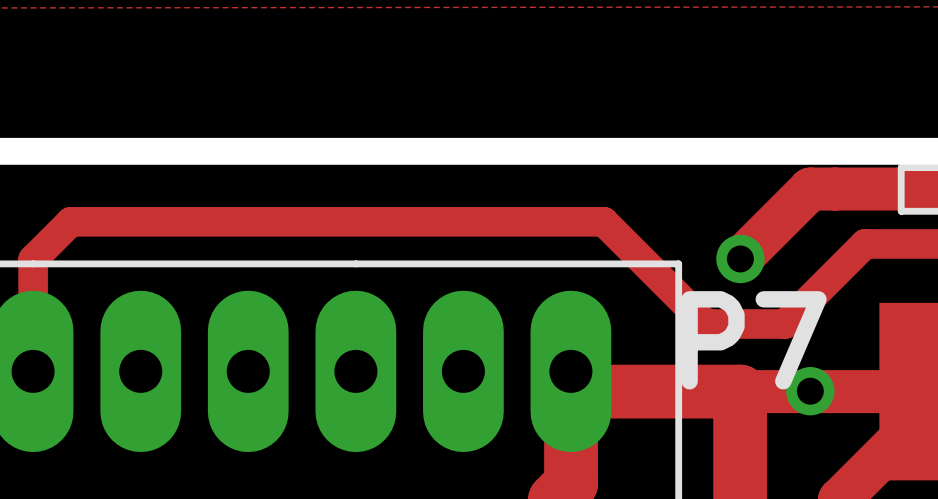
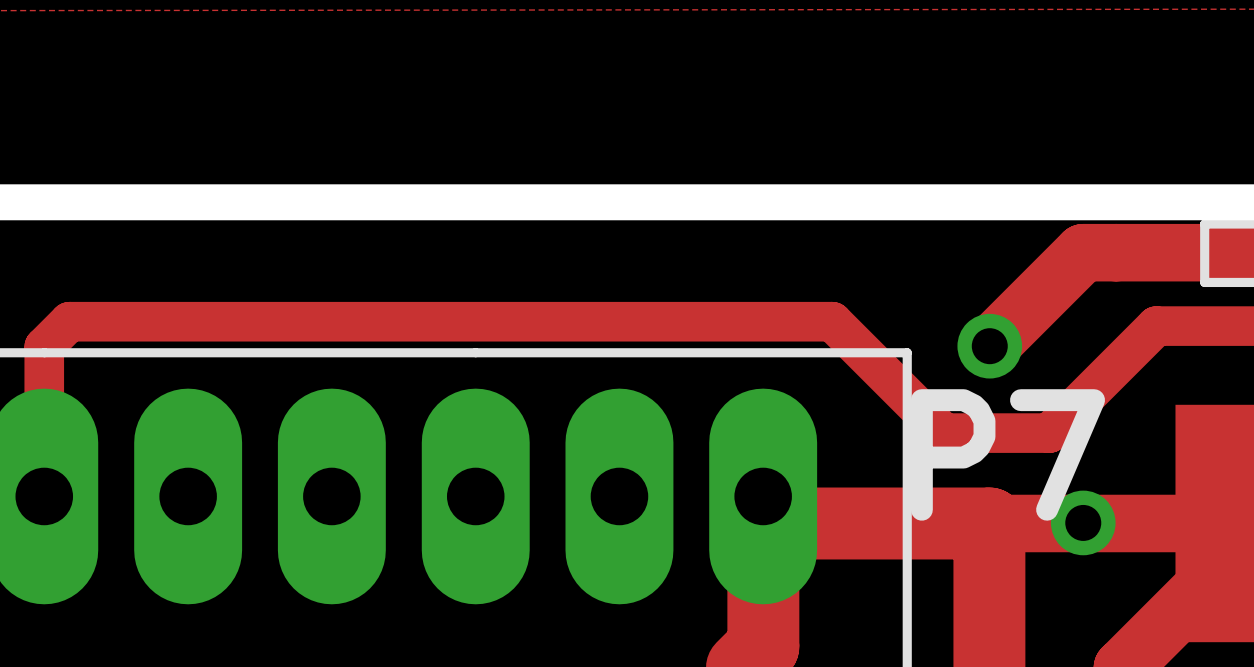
track: (51, 240) (70, 221) (603, 221) (622, 240) -> (69, 321) (832, 321)

